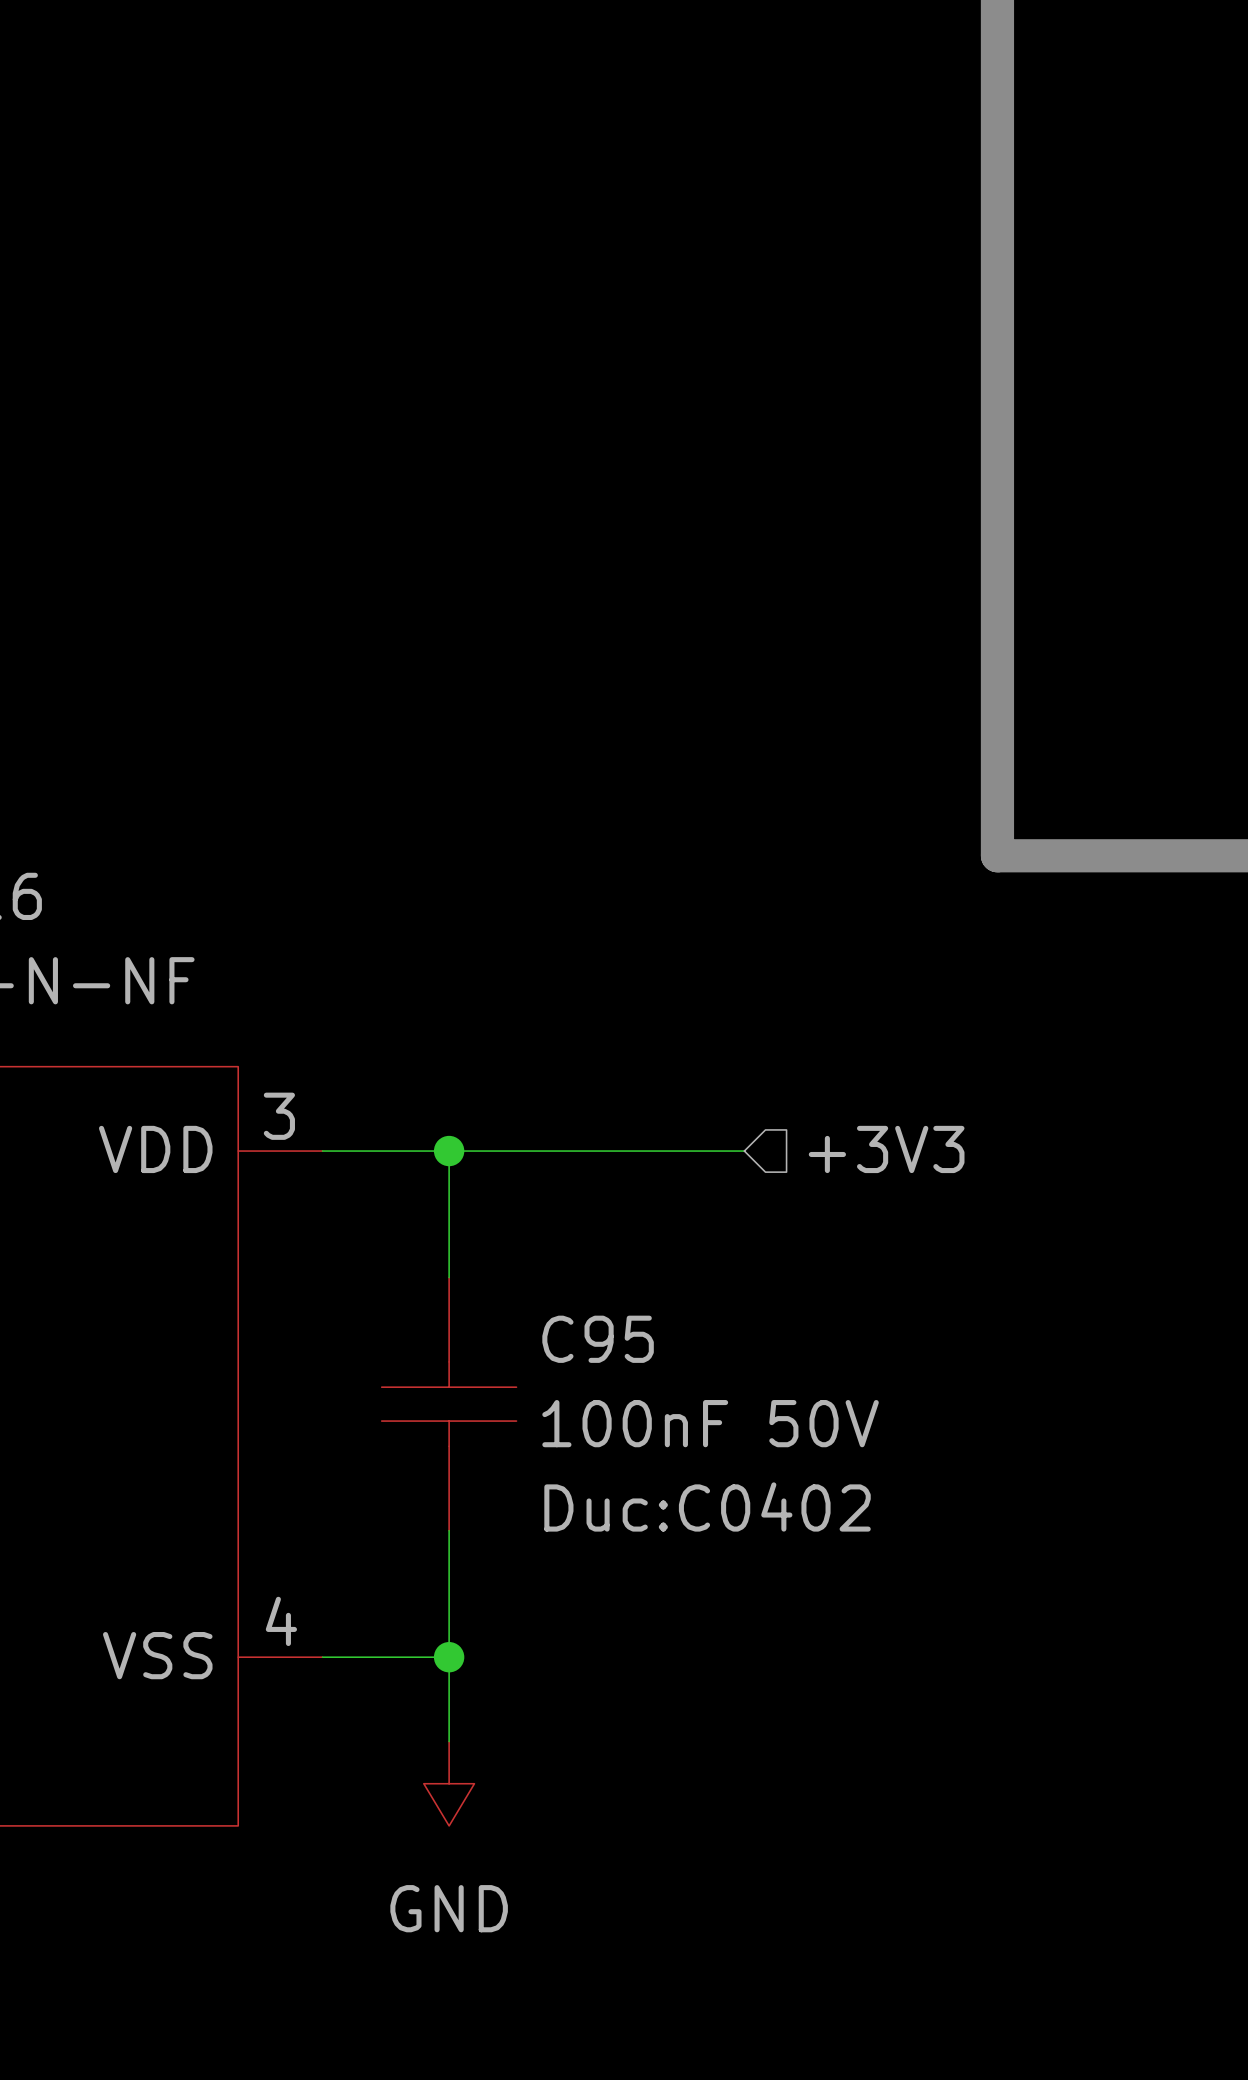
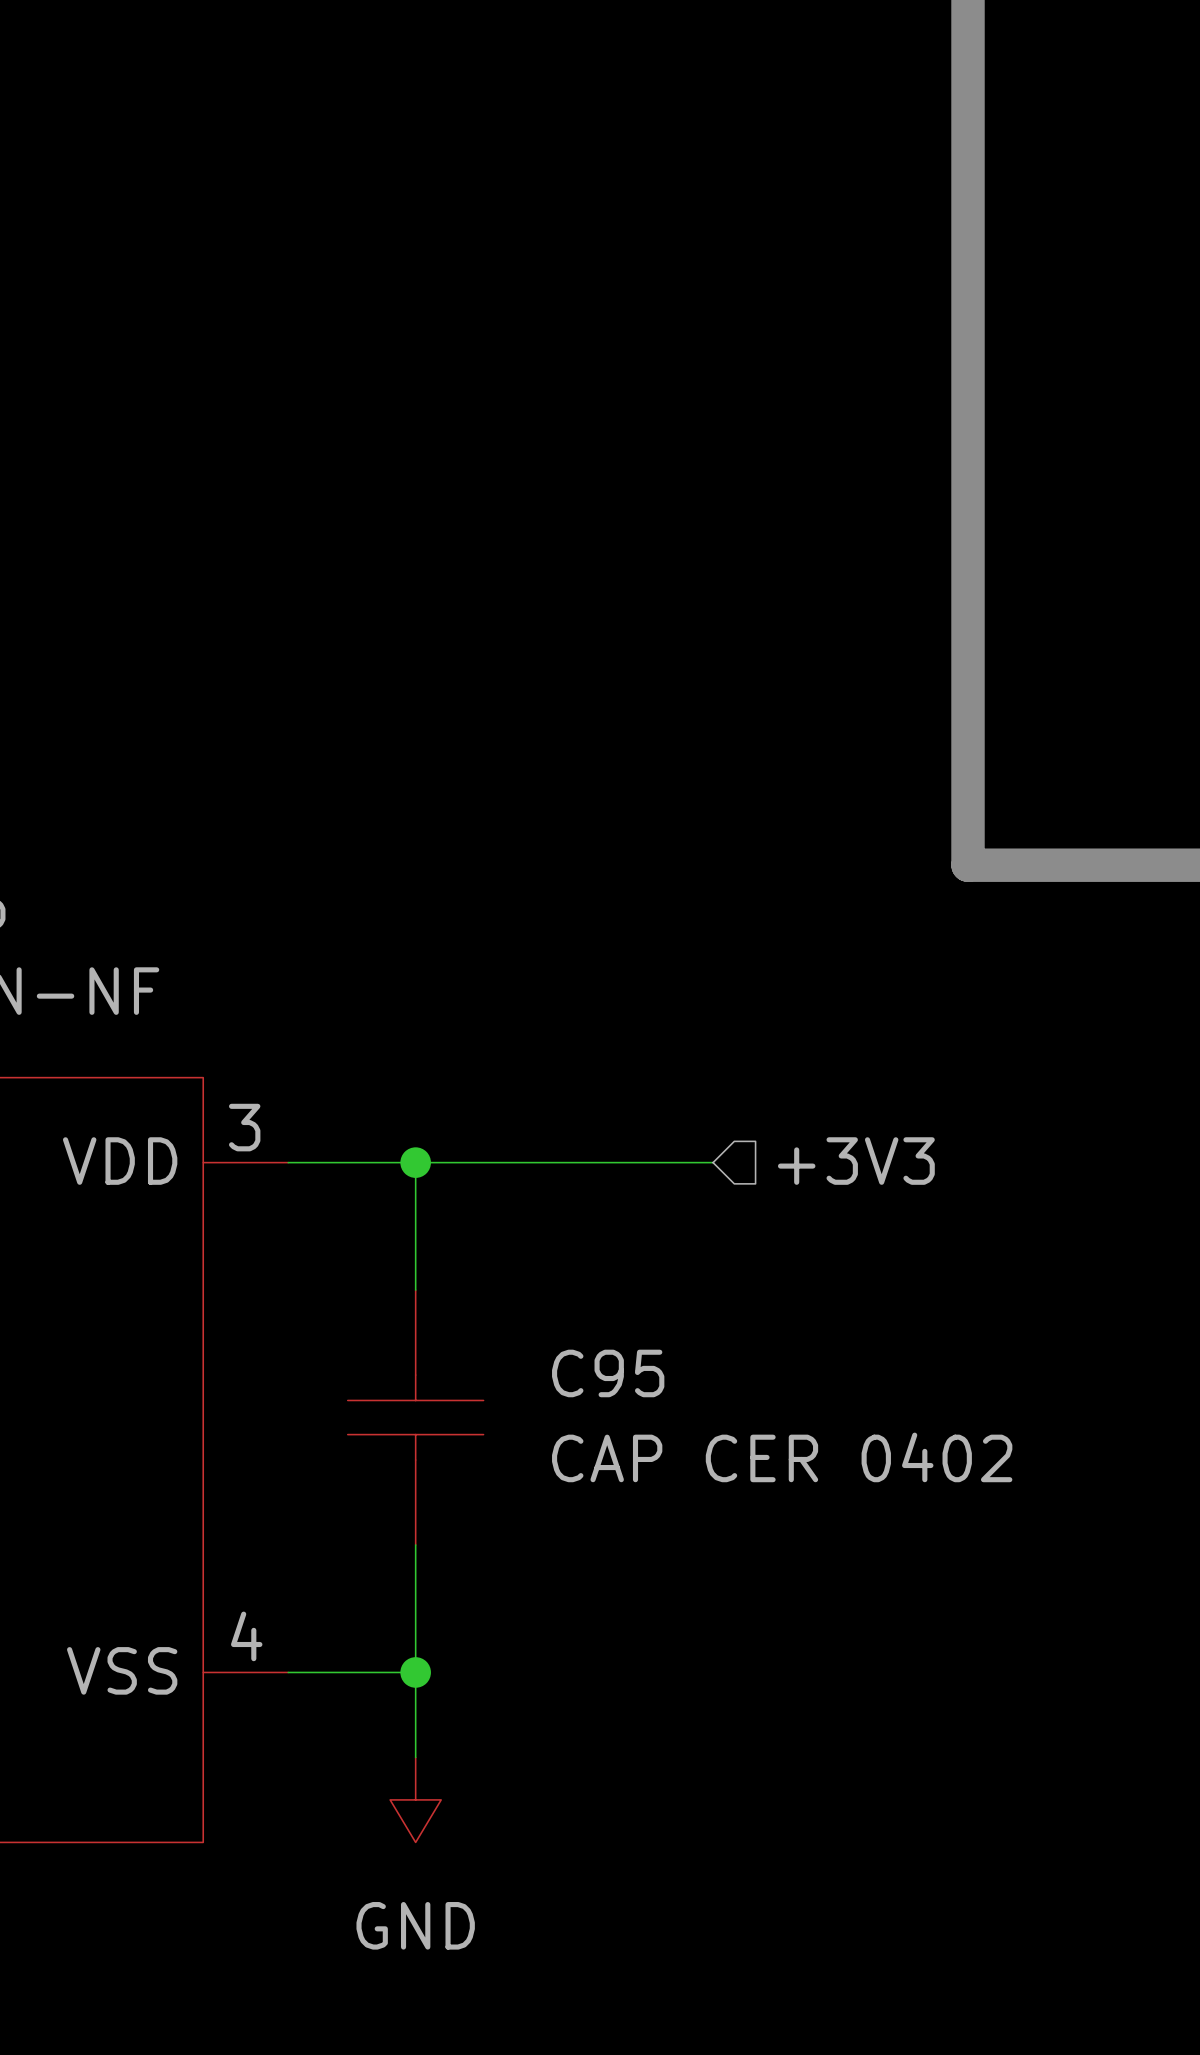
C95 name position: C95 (598, 1339) -> C95 (608, 1373)
C95 value: 100nF 50V (710, 1423) -> CAP CER 0402 (782, 1457)
C95 text: Duc:C0402 (707, 1506) -> none

